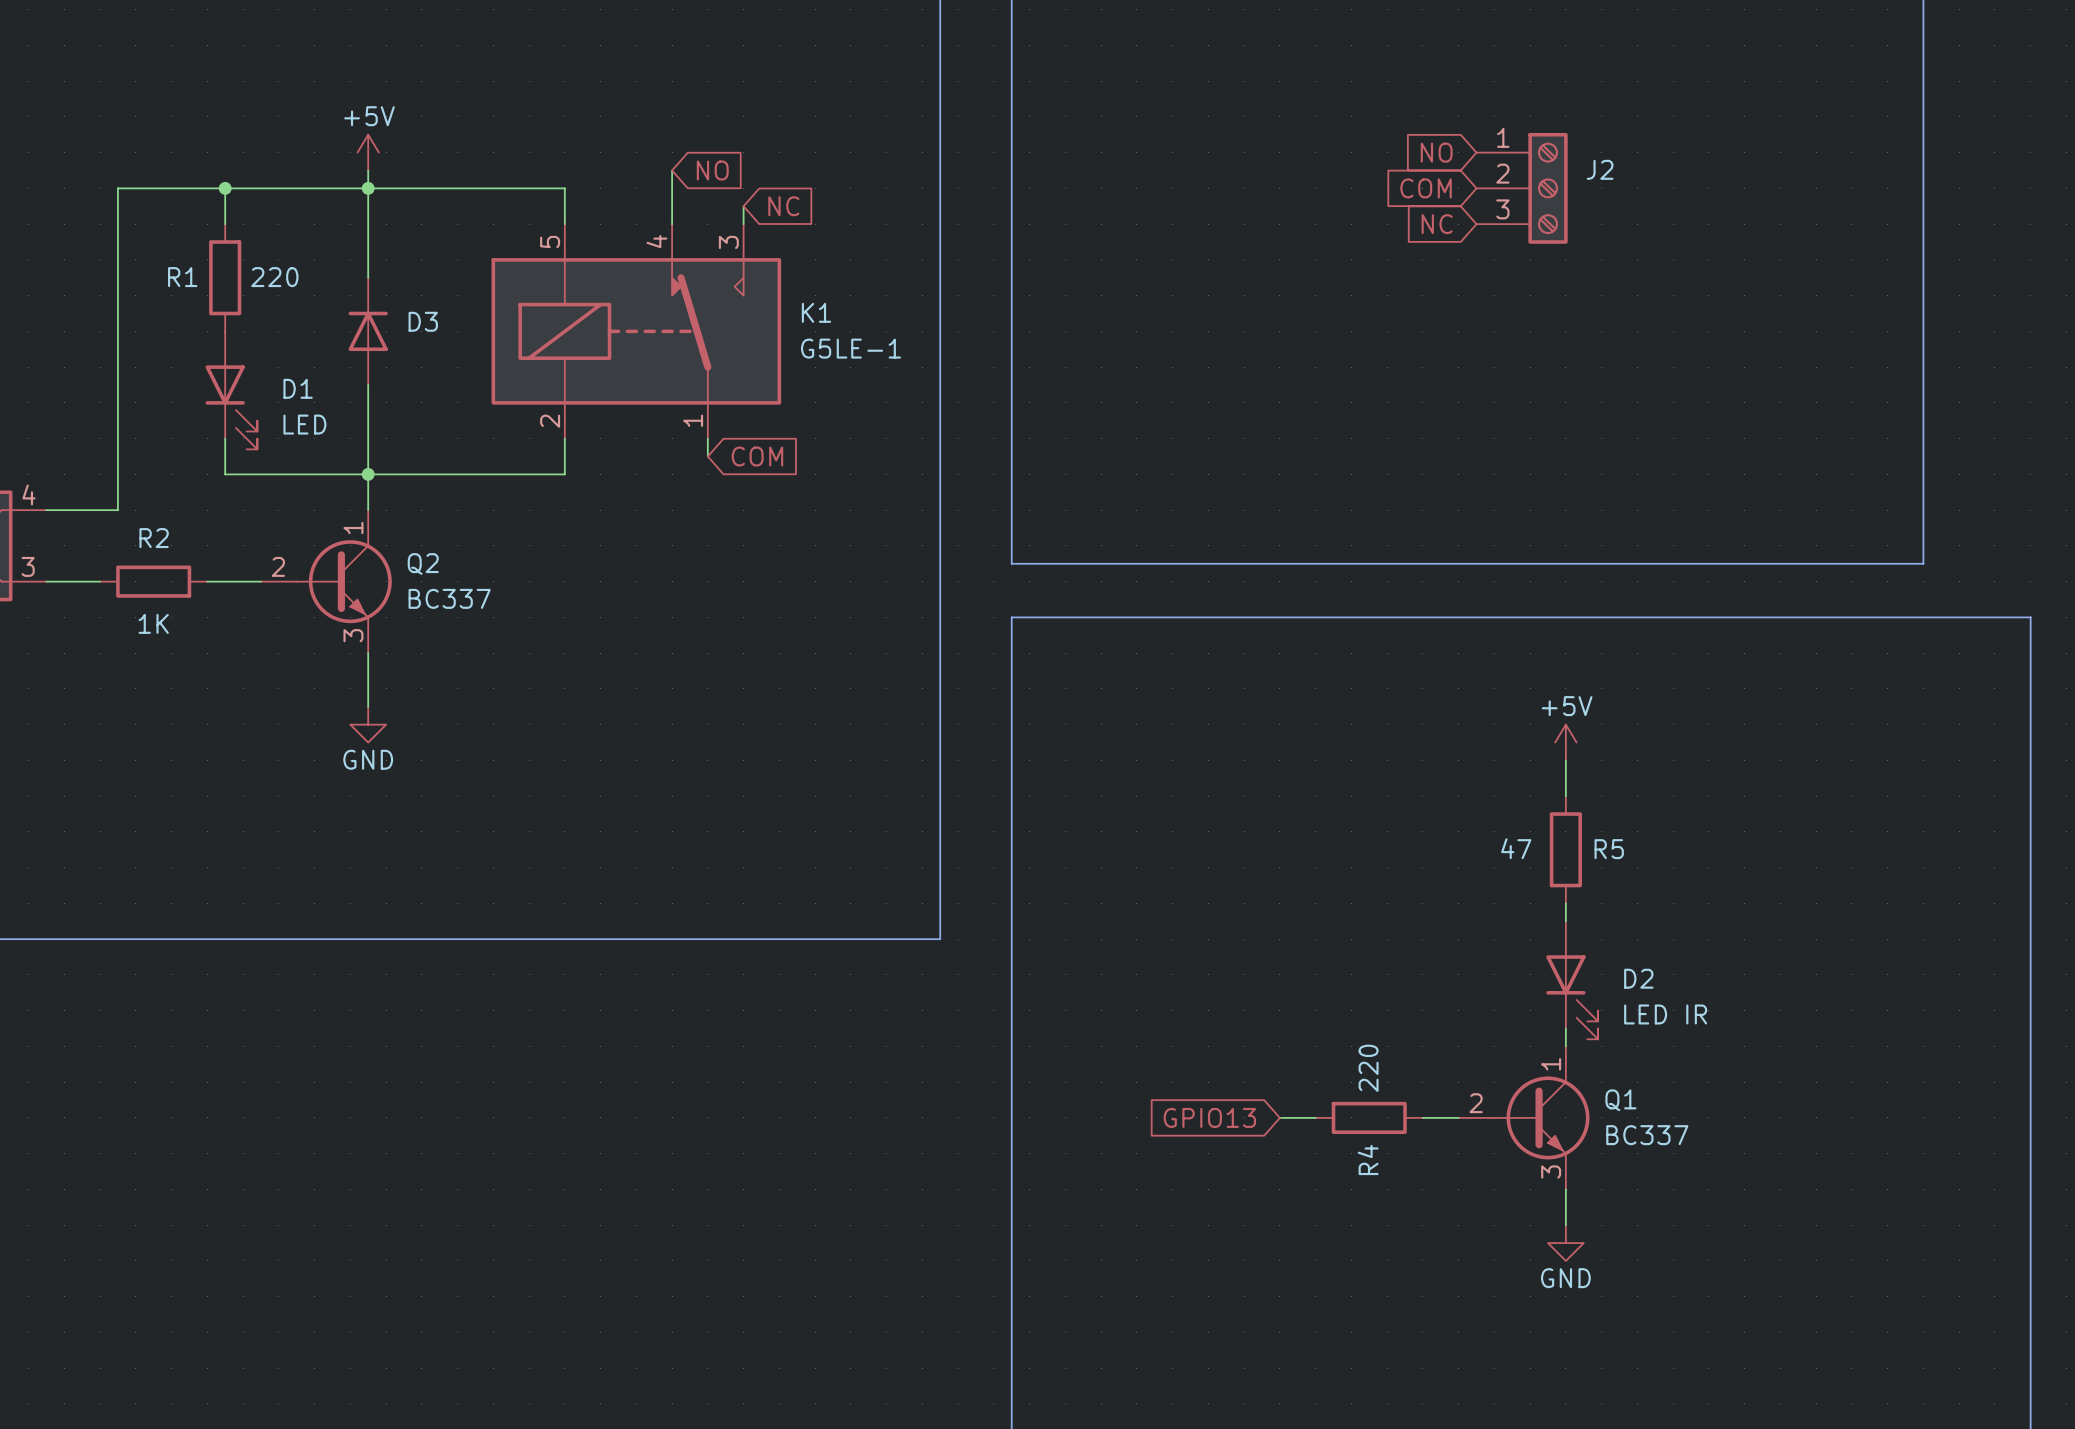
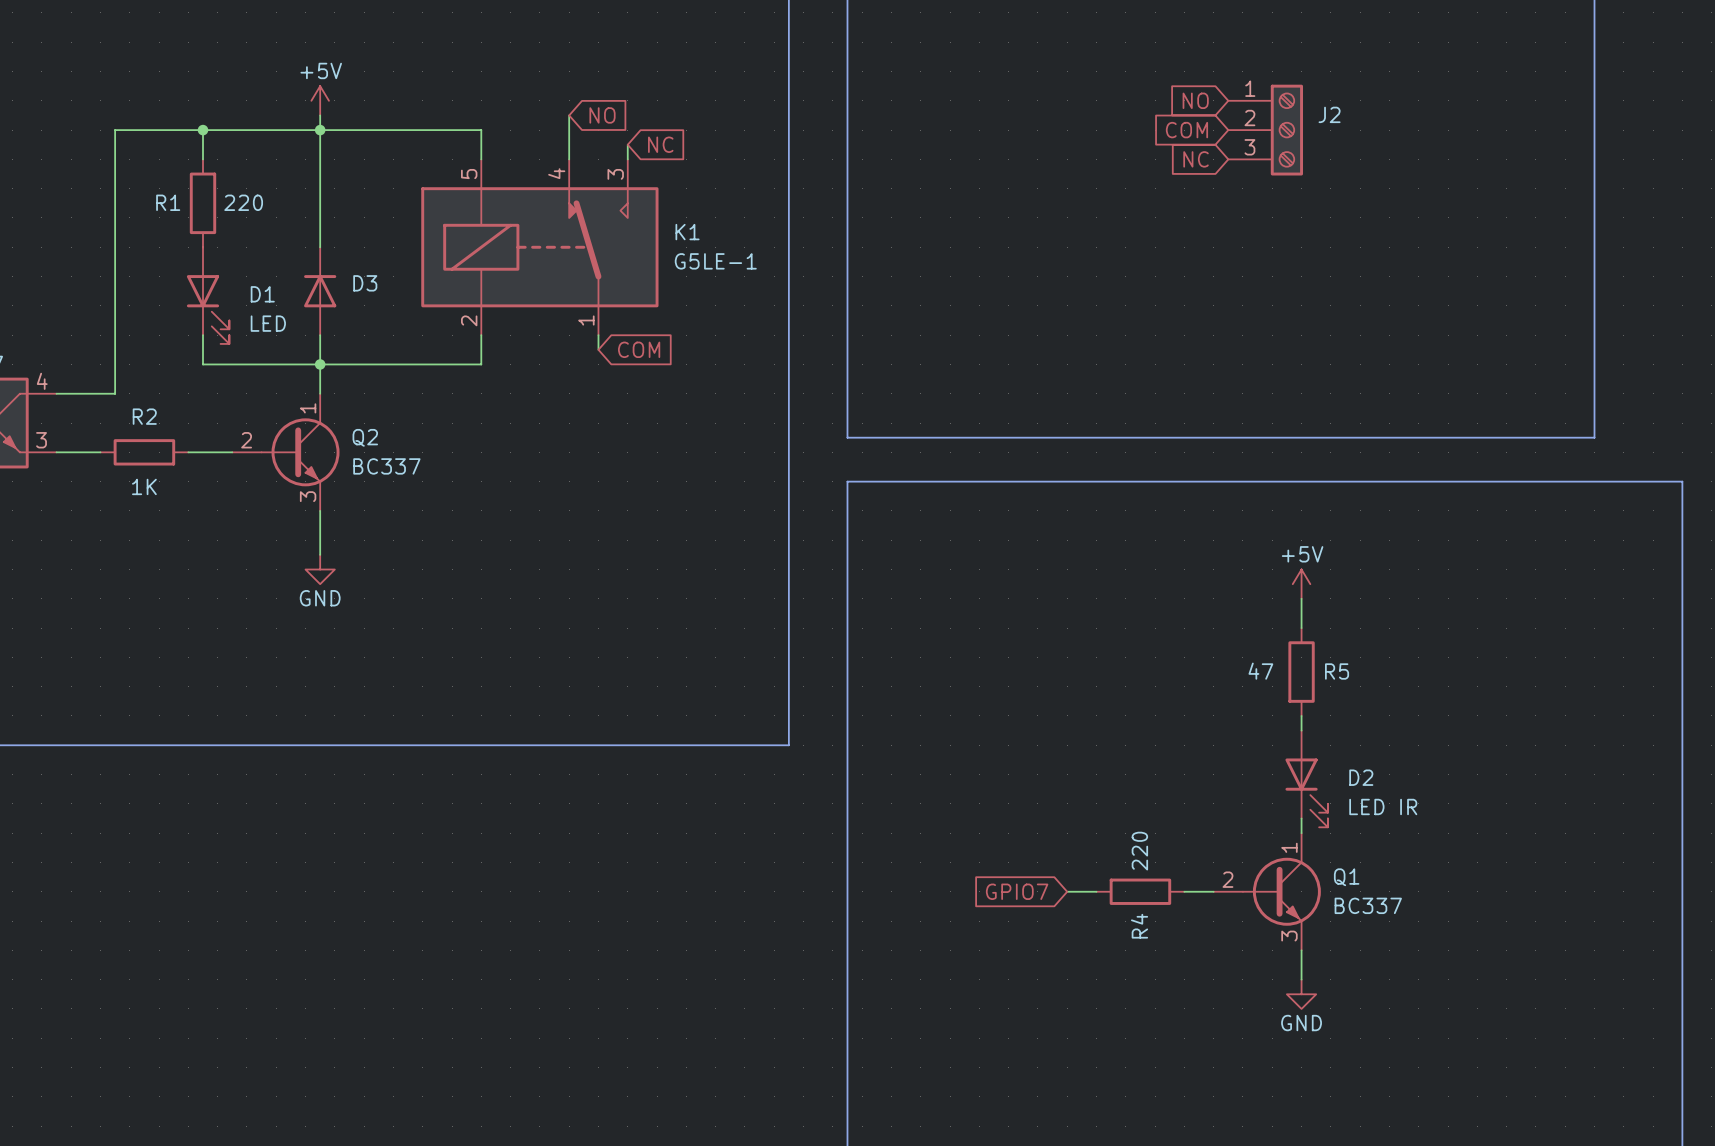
D3 position: (368, 331) -> (320, 291)
global label: GPIO13 (1209, 1117) -> GPIO7 (1017, 891)

